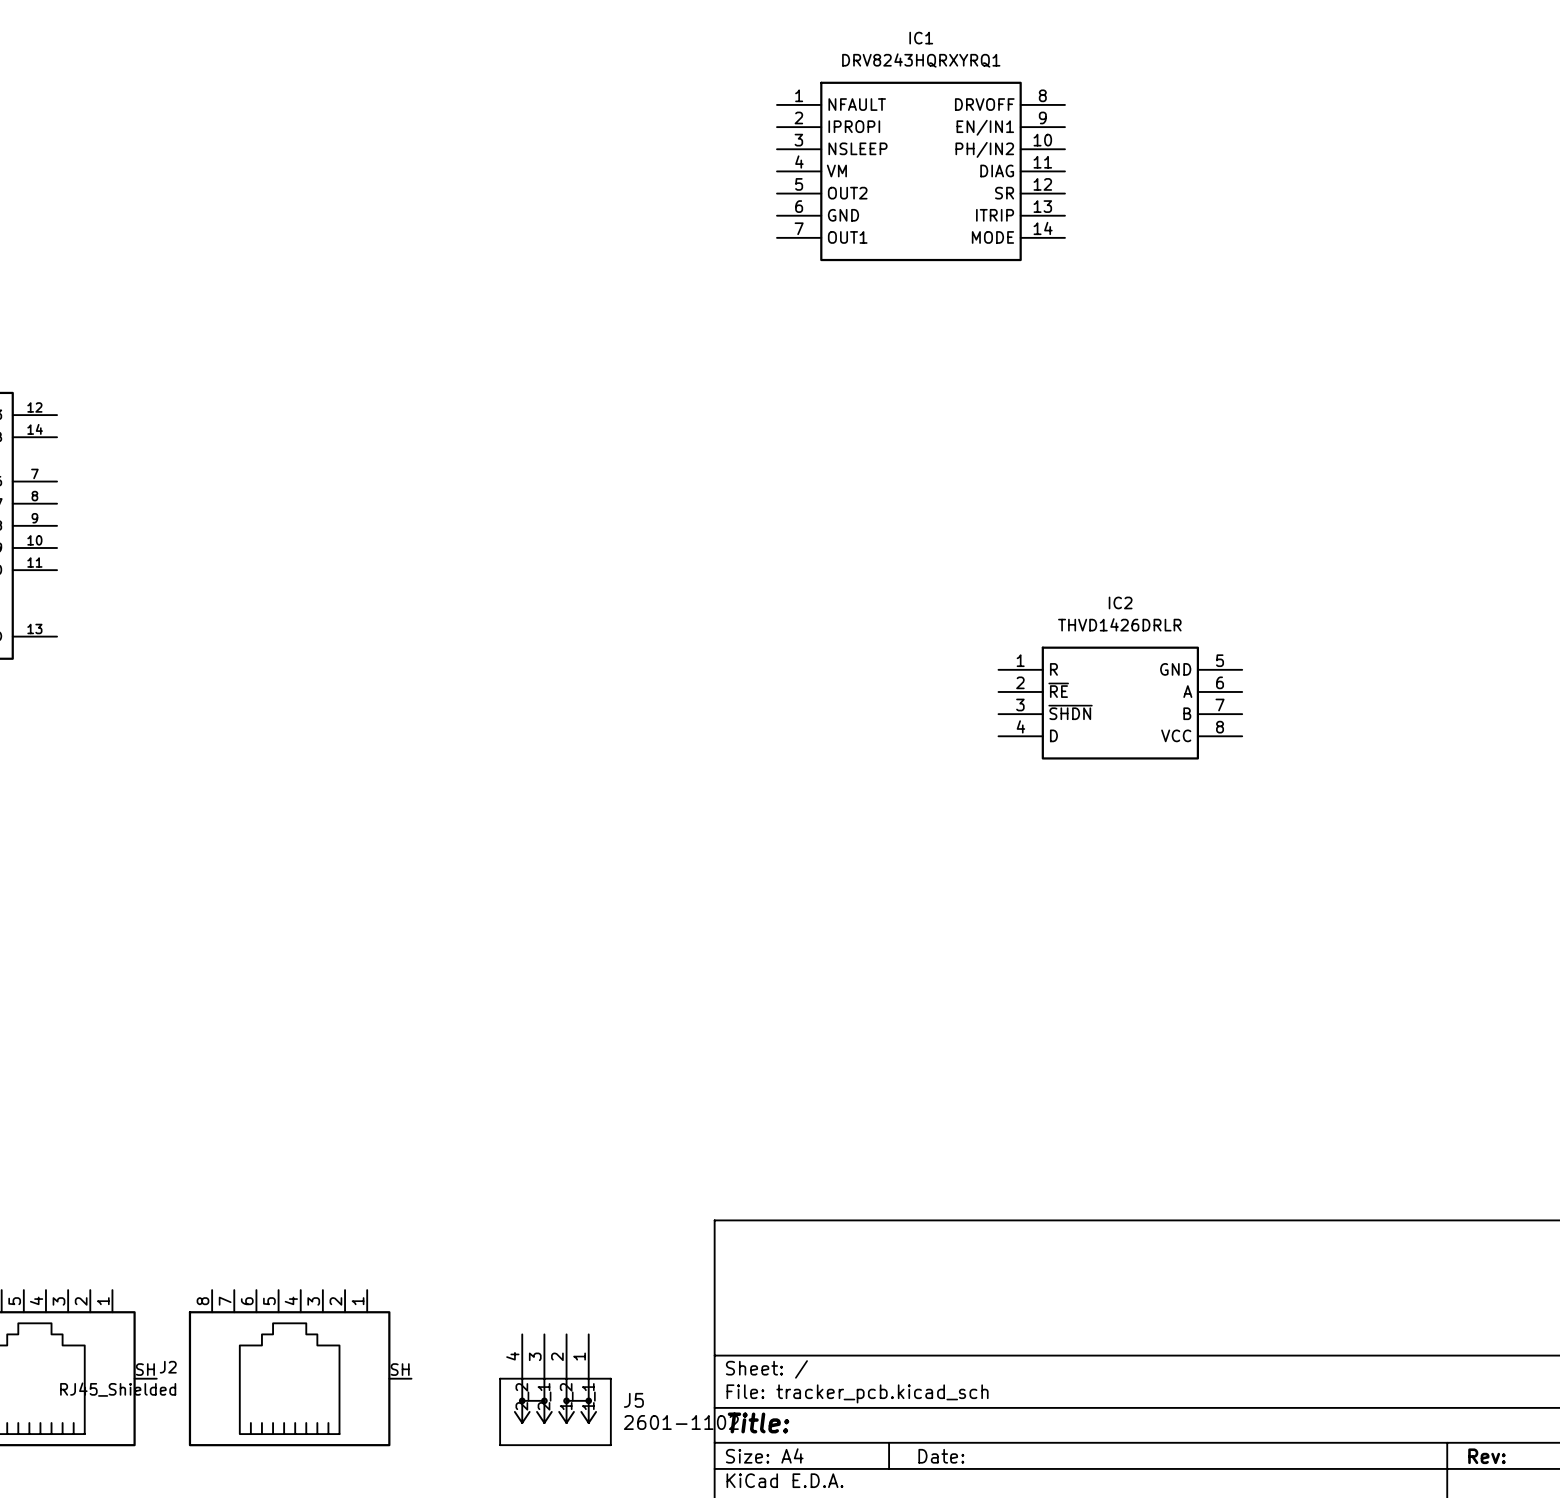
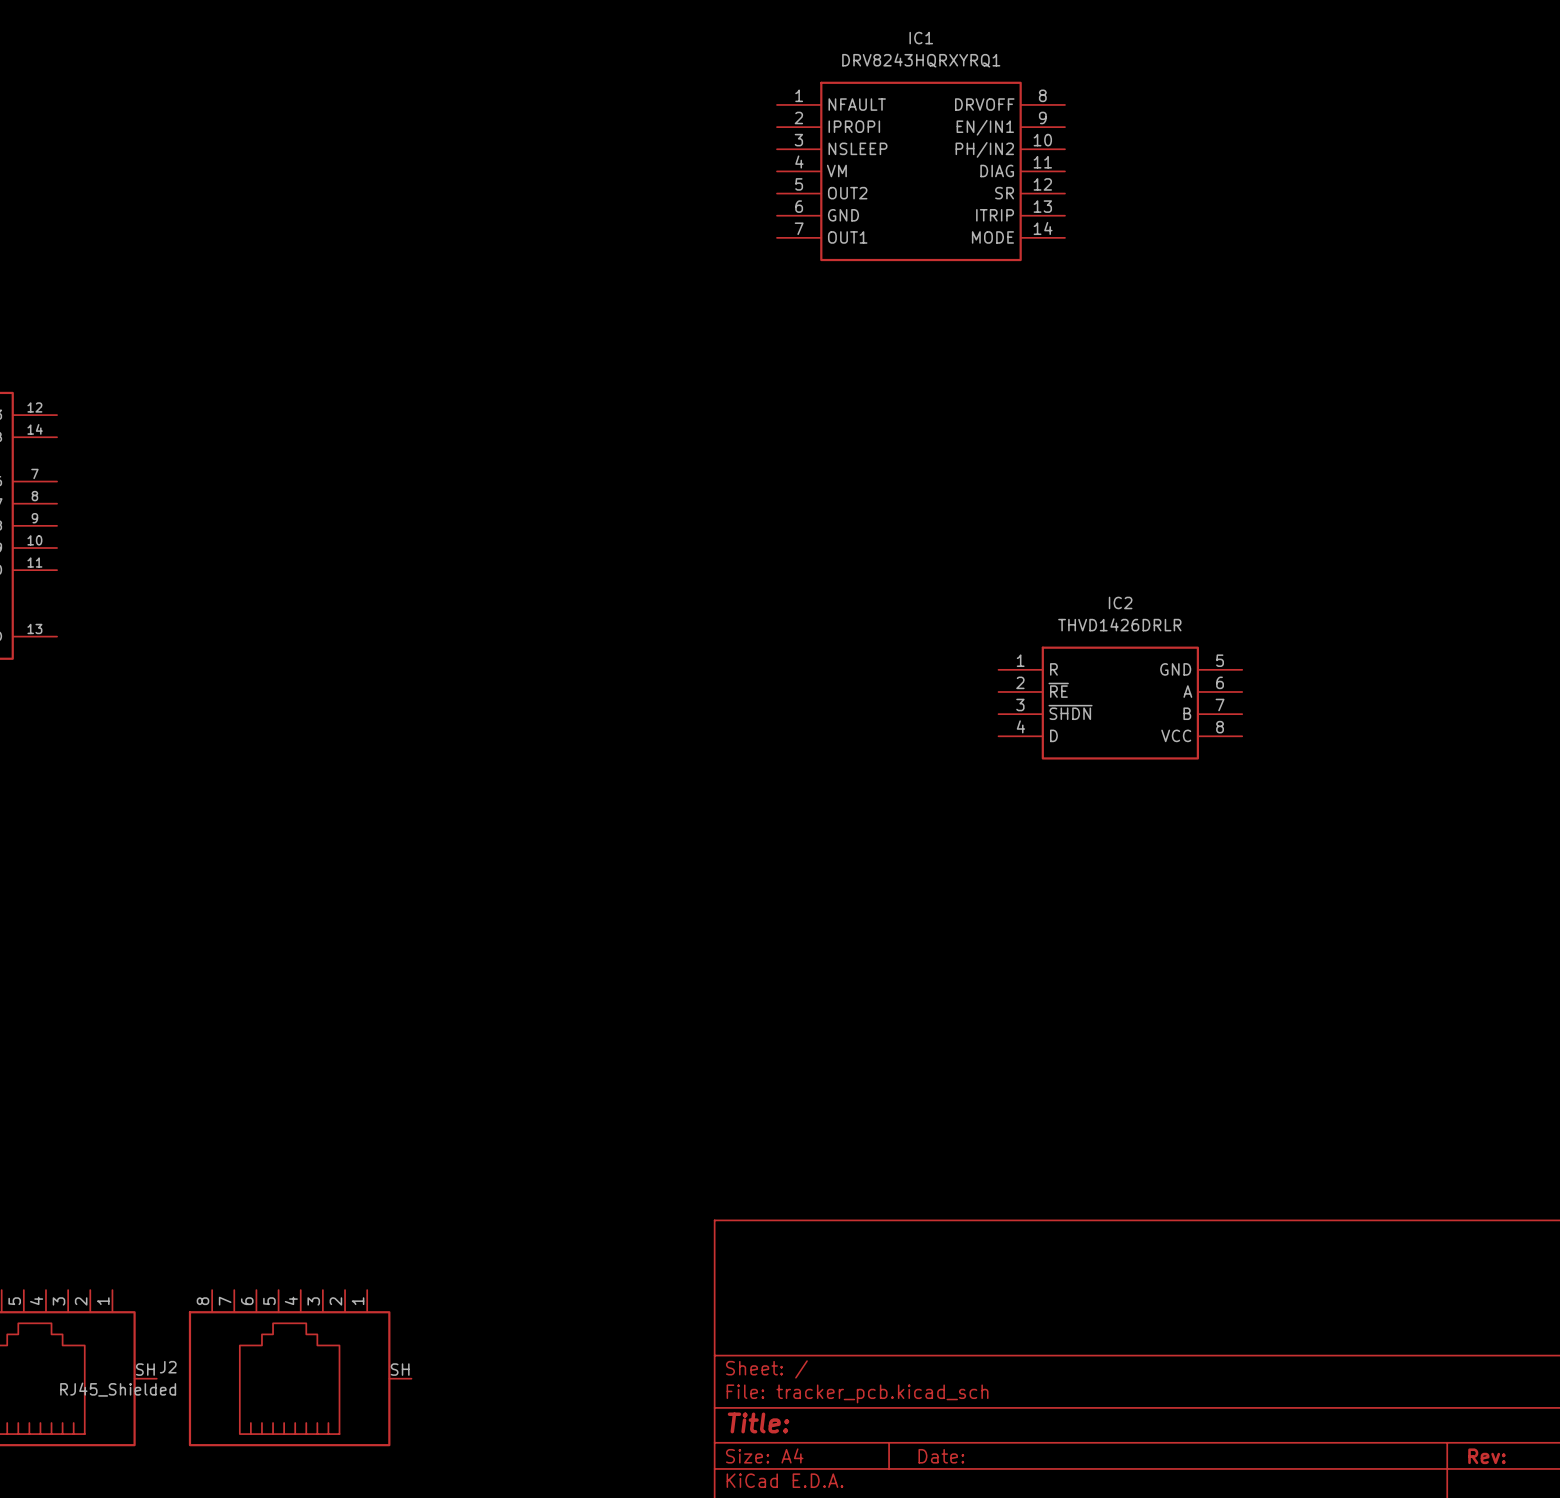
J5: 2601-1102 (555, 1390) -> none

